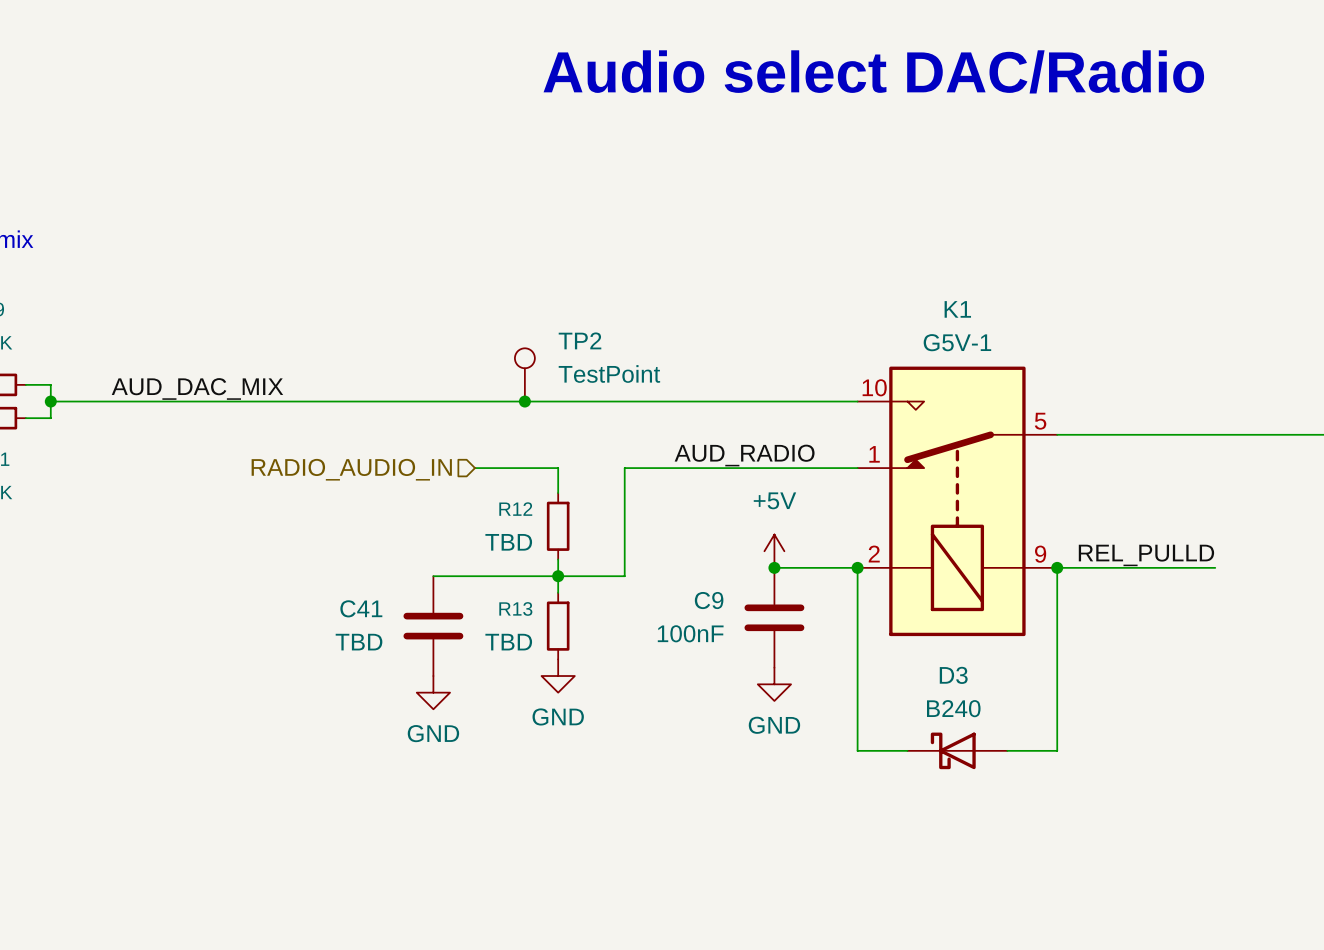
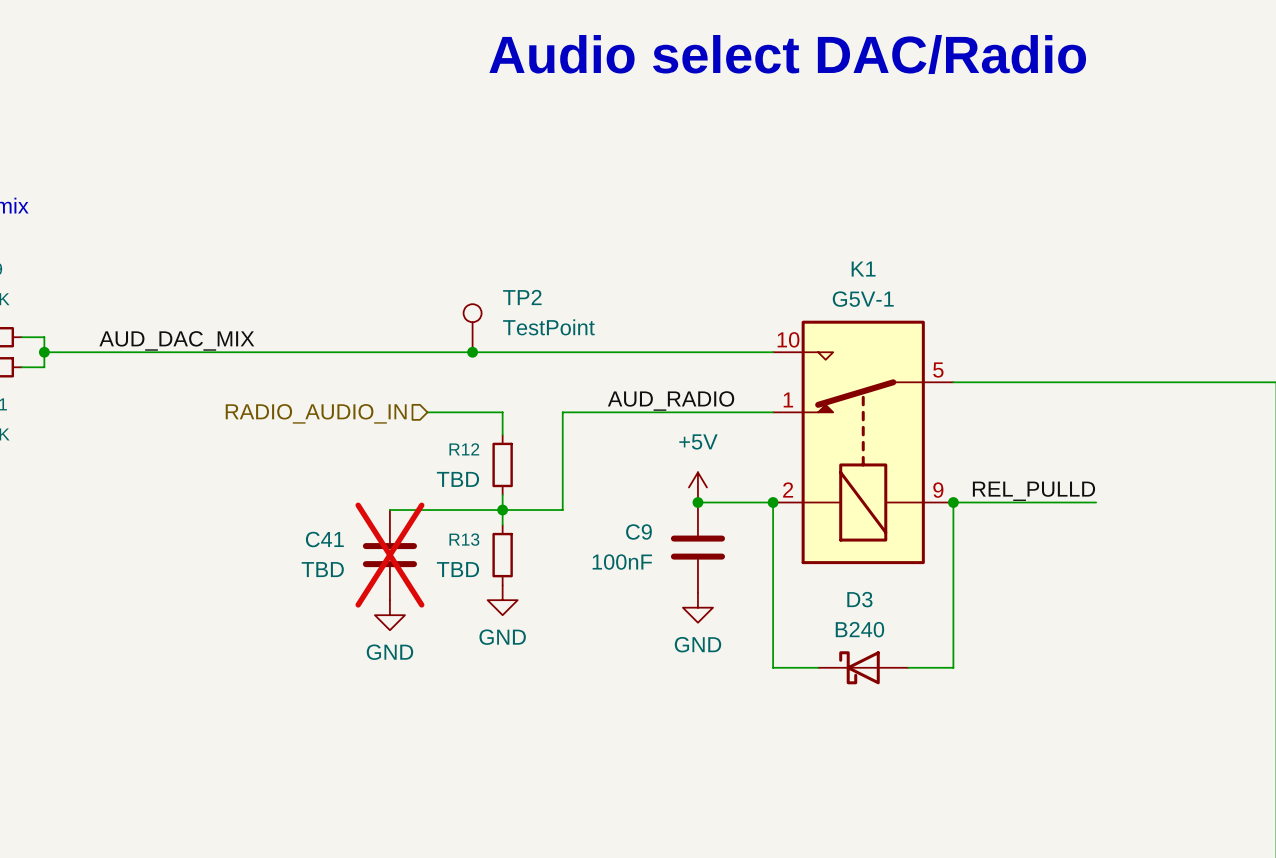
C41 do-not-place cross: none -> (389, 555)

